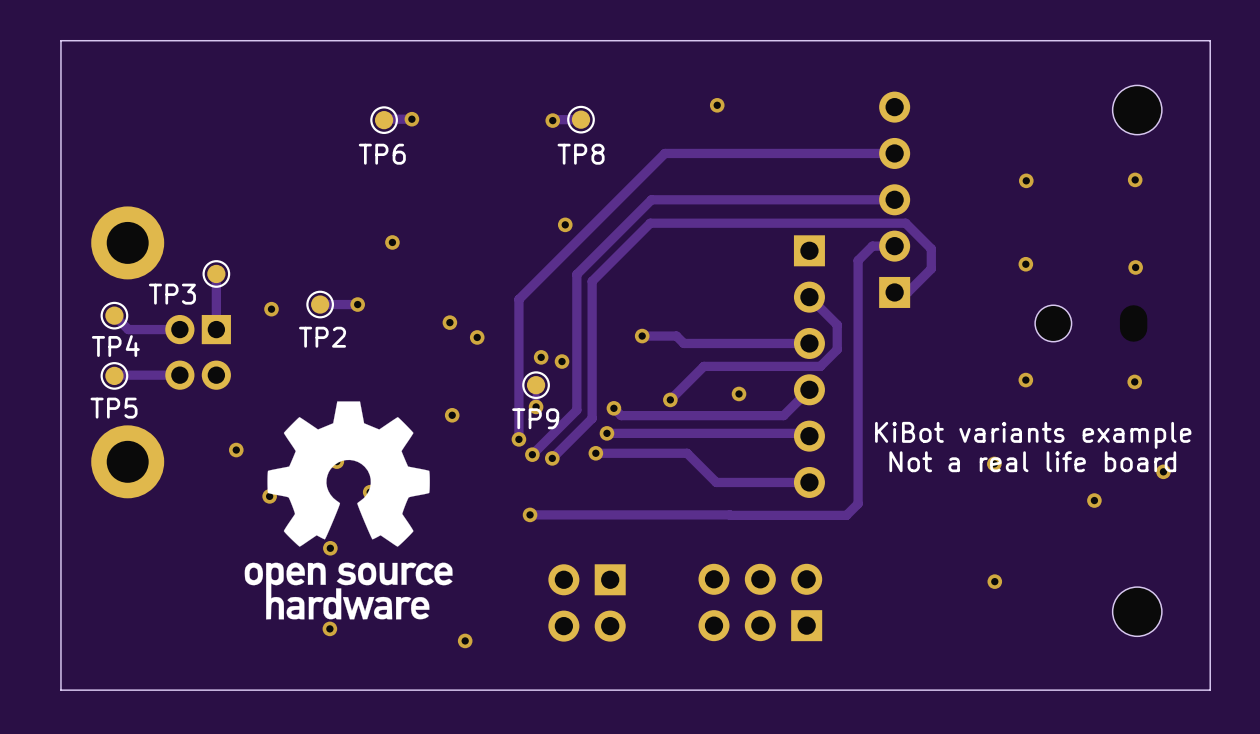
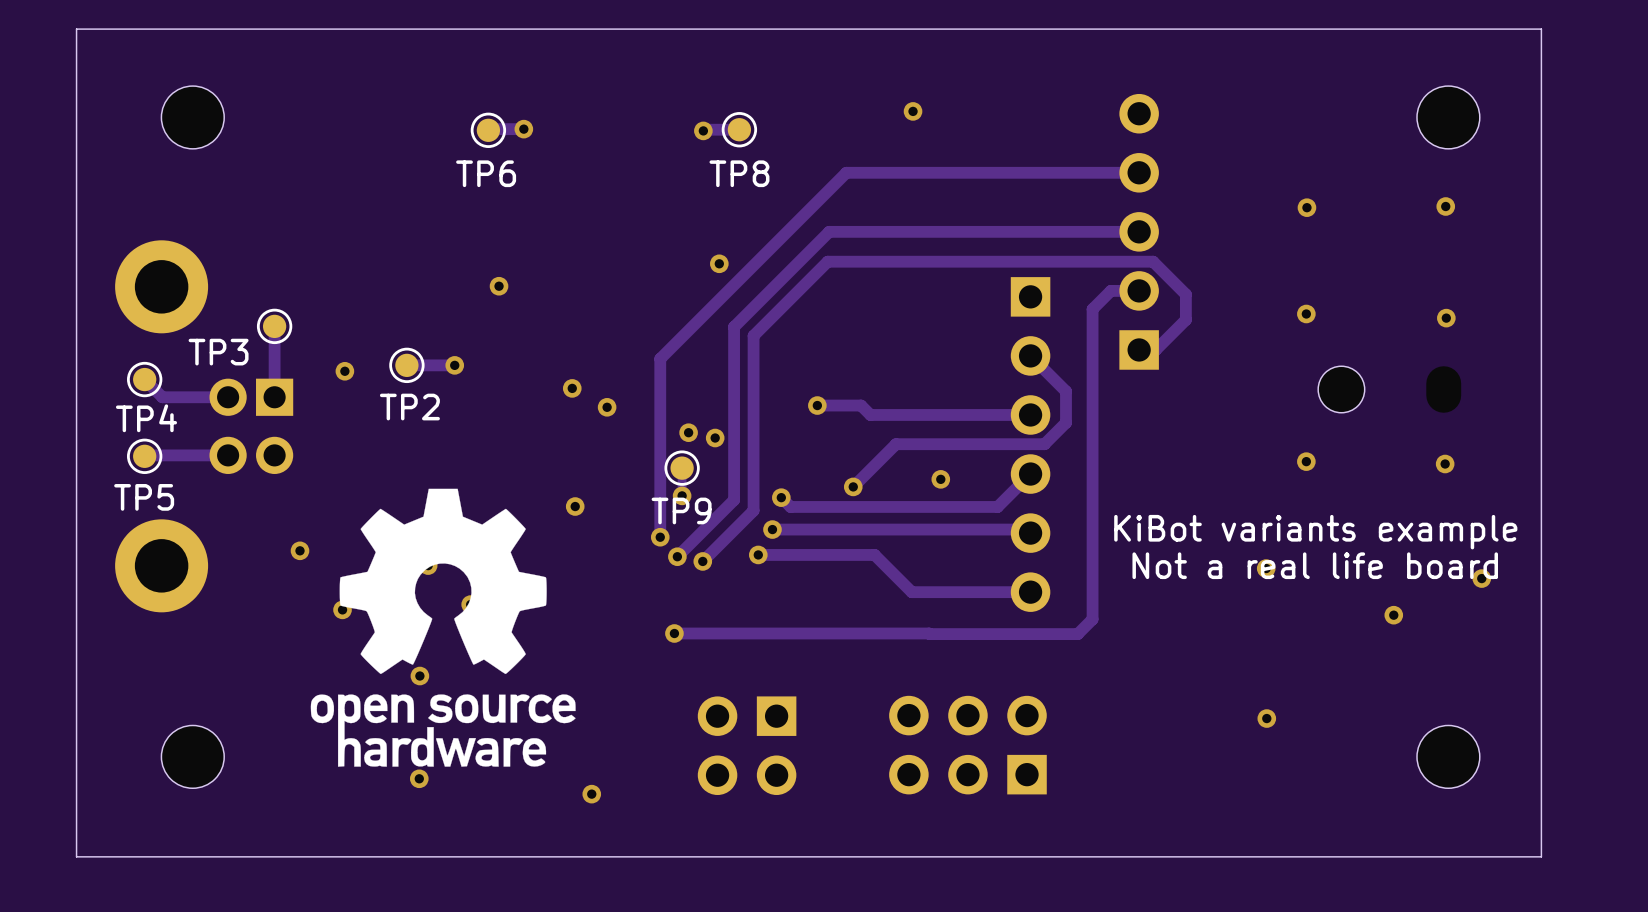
part: none -> (192, 117)
part: none -> (192, 756)

